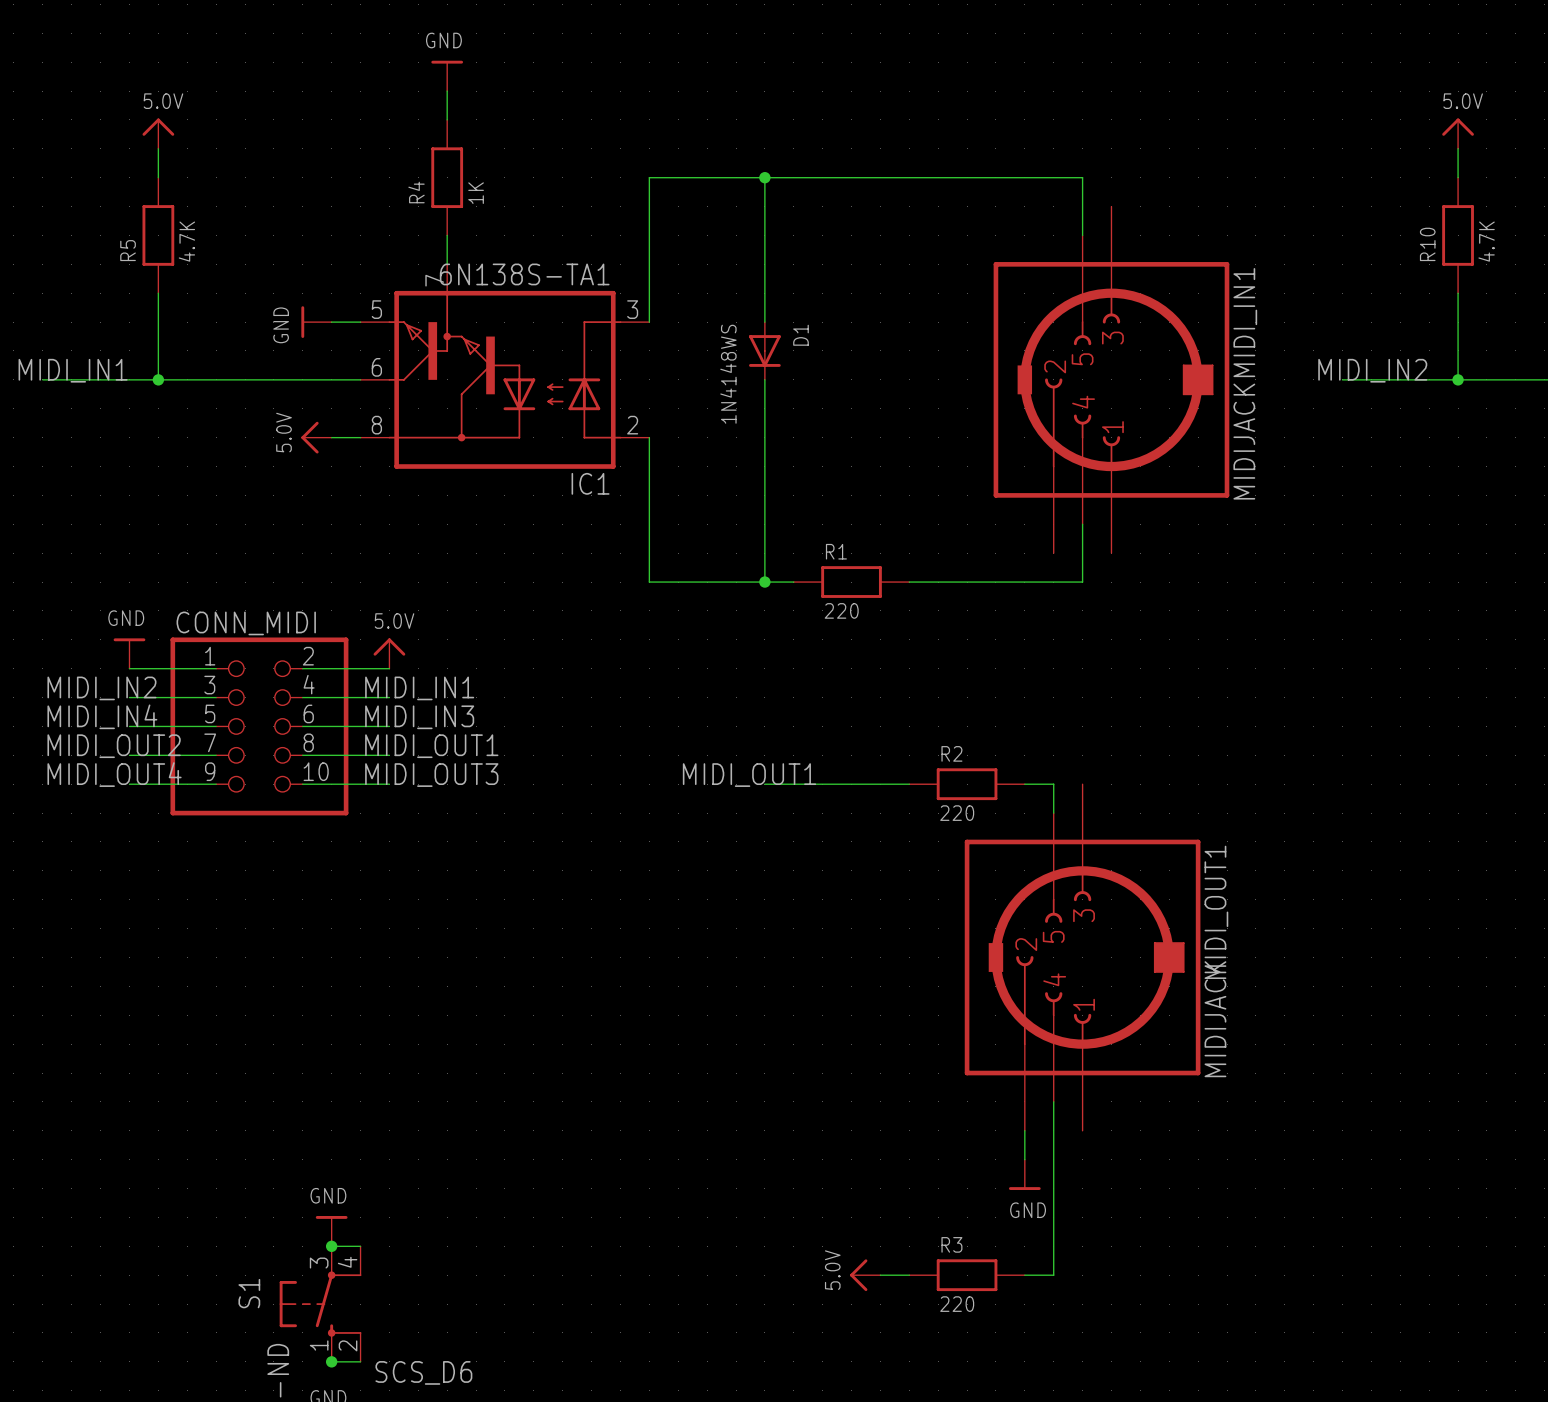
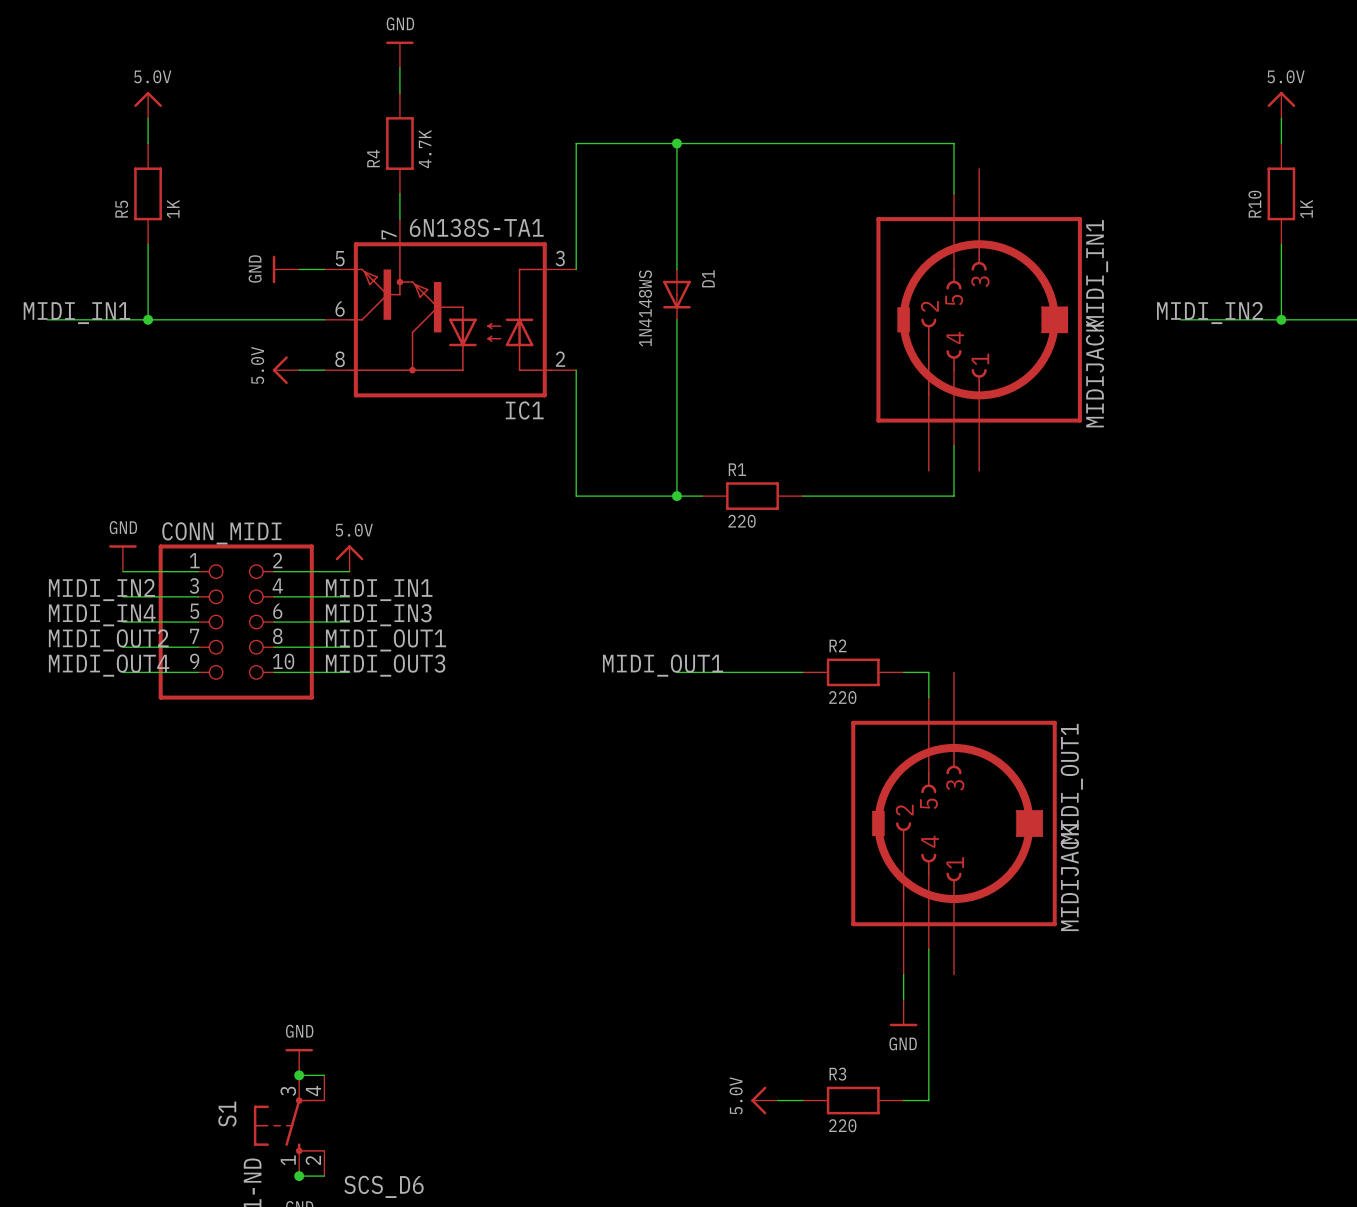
R4 value: 1K (476, 193) -> 4.7K (425, 149)
R5 value: 4.7K (186, 241) -> 1K (173, 209)
R10 value: 4.7K (1486, 241) -> 1K (1306, 209)

